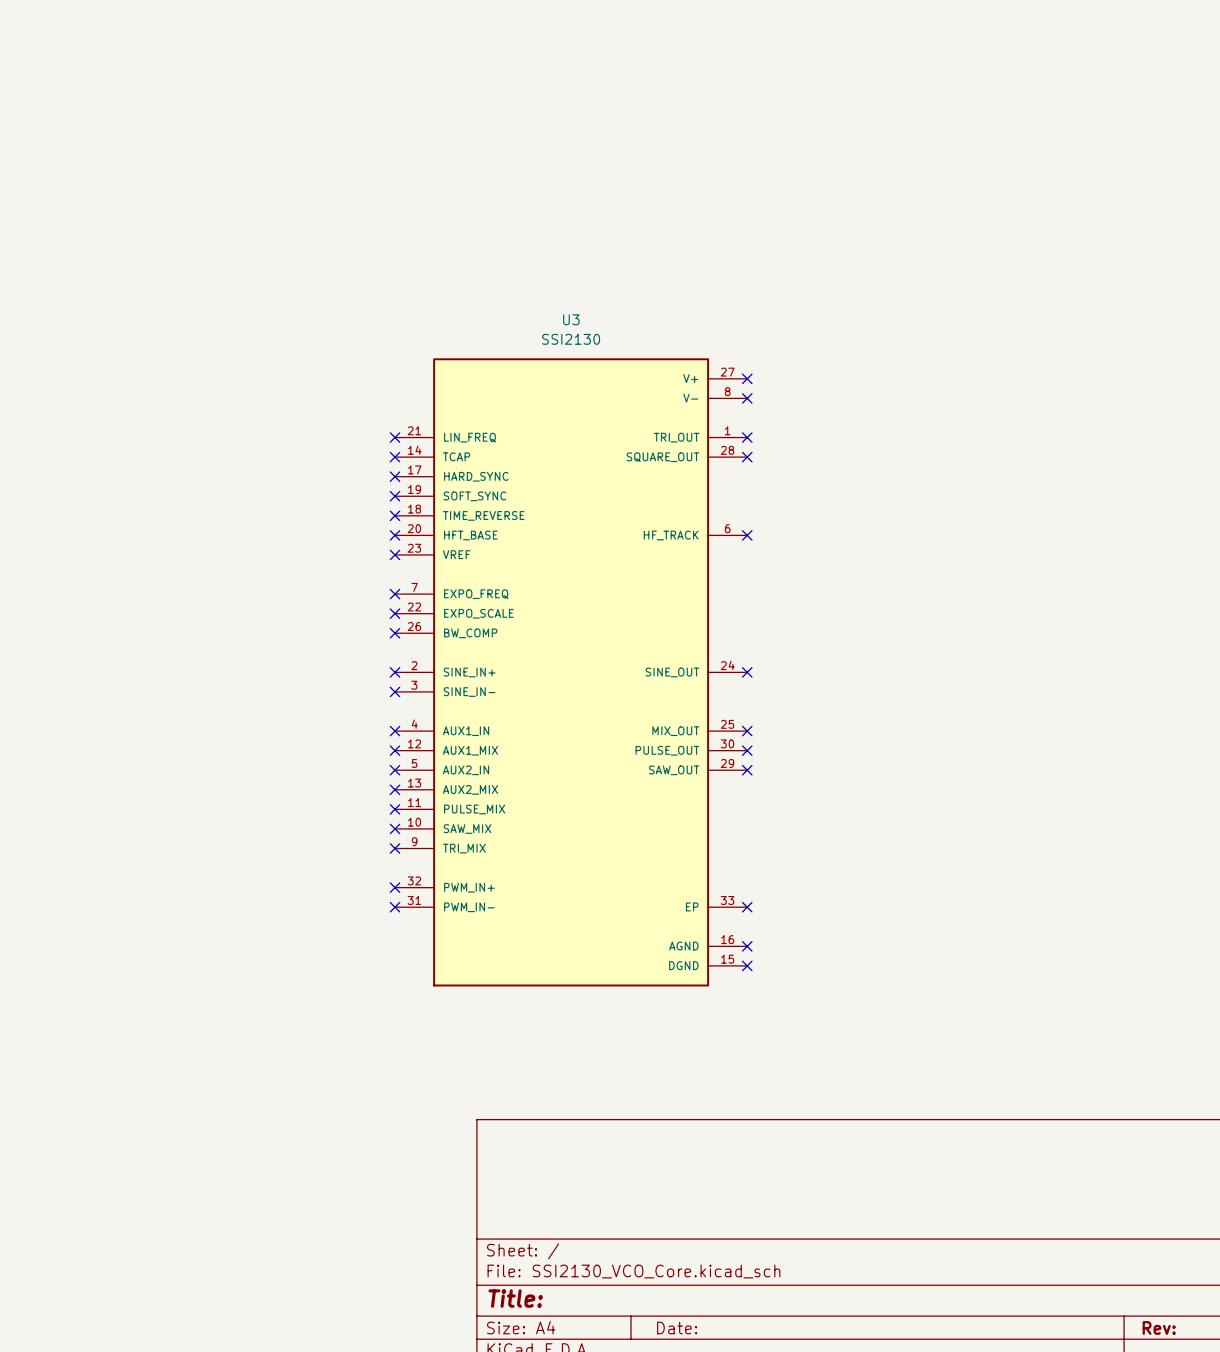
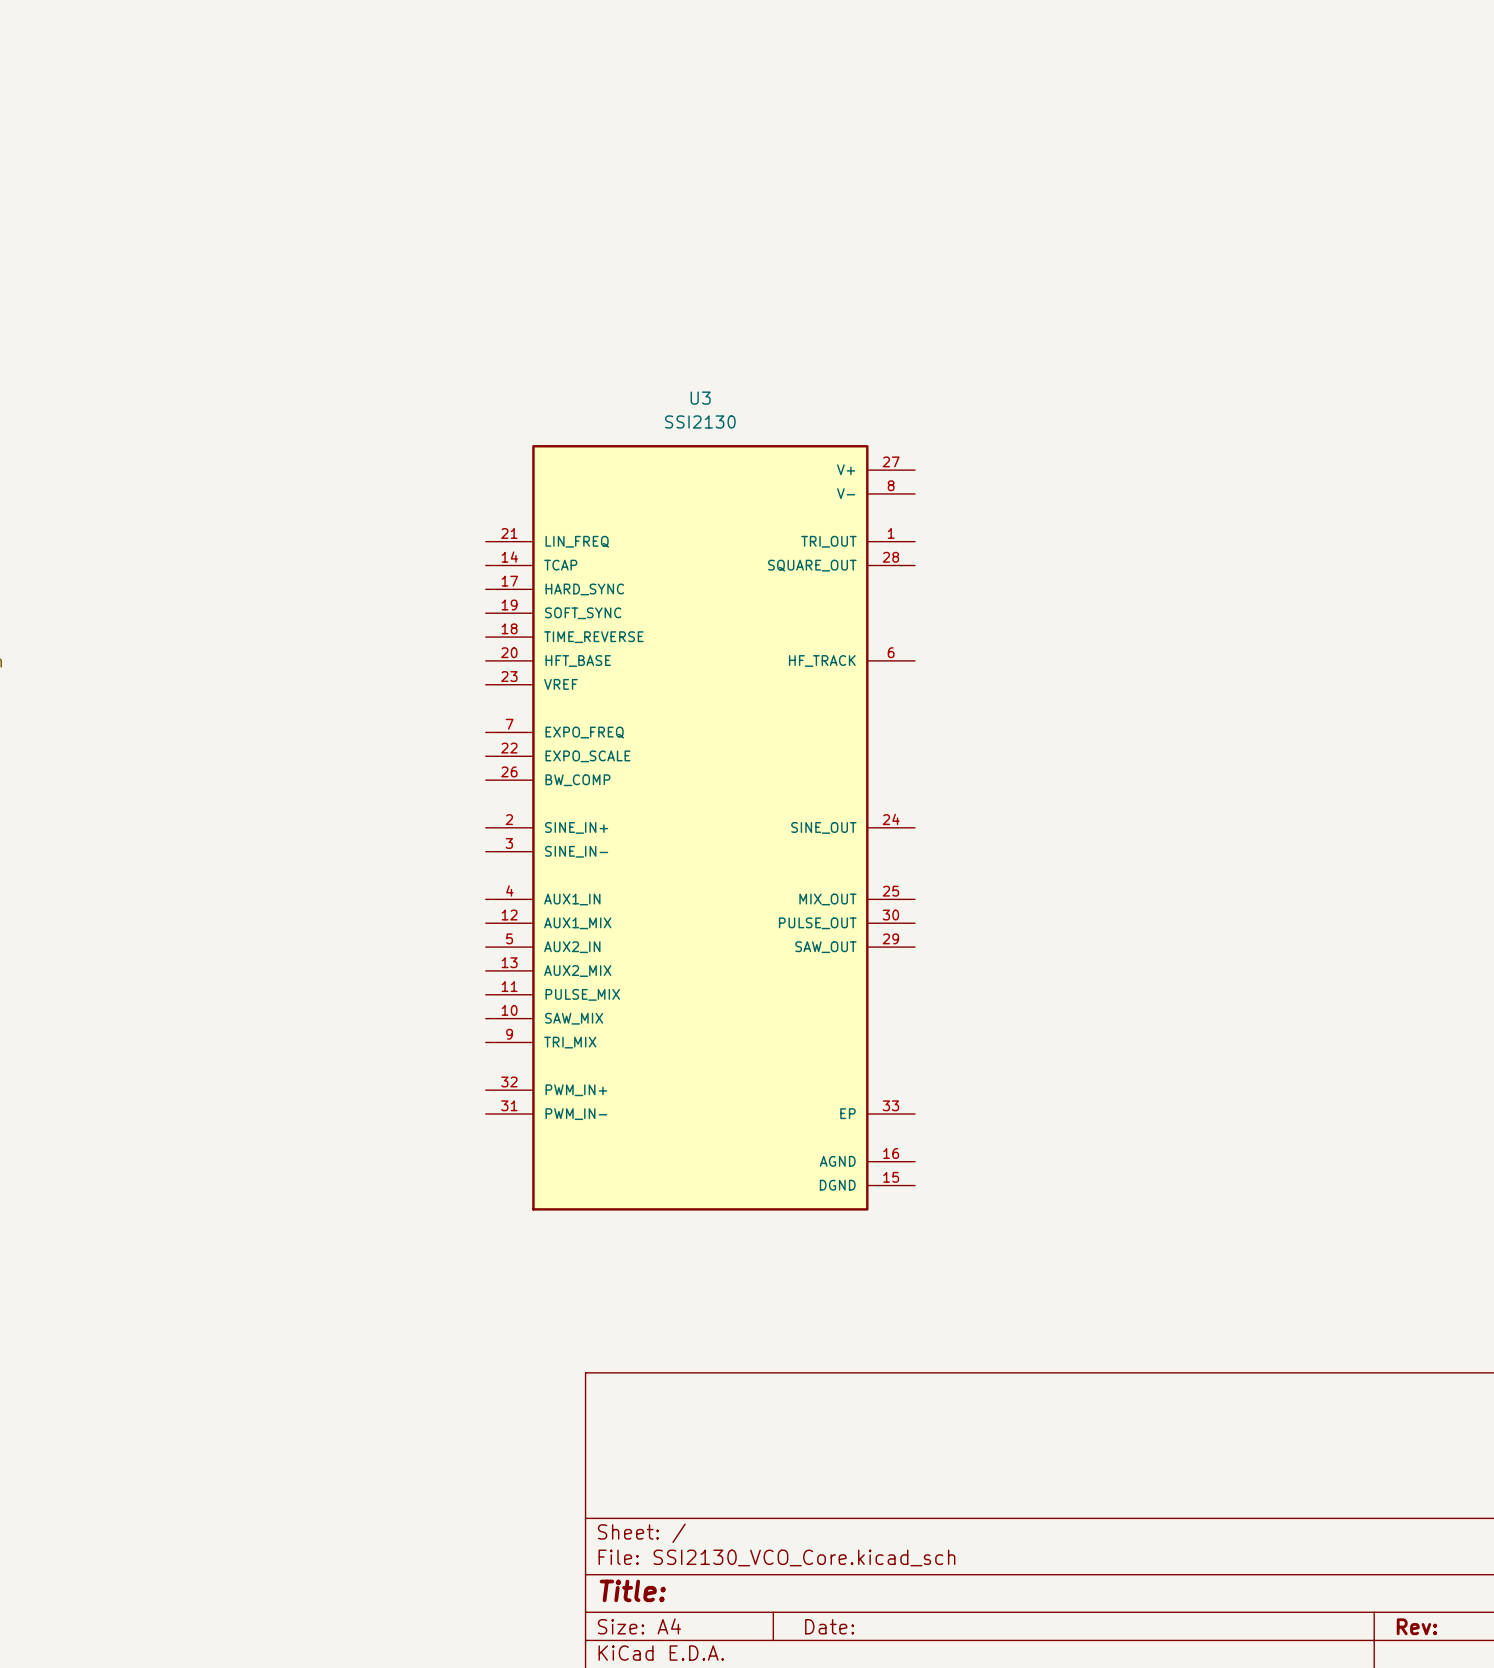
no-connect mark: (747, 378) -> none
no-connect mark: (747, 398) -> none
no-connect mark: (395, 437) -> none
no-connect mark: (747, 437) -> none
no-connect mark: (395, 457) -> none
no-connect mark: (747, 457) -> none
no-connect mark: (395, 476) -> none
no-connect mark: (395, 496) -> none
no-connect mark: (395, 515) -> none
no-connect mark: (395, 535) -> none
no-connect mark: (747, 535) -> none
no-connect mark: (395, 554) -> none
no-connect mark: (395, 594) -> none
no-connect mark: (395, 613) -> none
no-connect mark: (395, 633) -> none
no-connect mark: (395, 672) -> none
no-connect mark: (747, 672) -> none
no-connect mark: (395, 691) -> none
no-connect mark: (395, 731) -> none
no-connect mark: (747, 731) -> none
no-connect mark: (395, 750) -> none
no-connect mark: (747, 750) -> none
no-connect mark: (395, 770) -> none
no-connect mark: (747, 770) -> none
no-connect mark: (395, 789) -> none
no-connect mark: (395, 809) -> none
no-connect mark: (395, 828) -> none
no-connect mark: (395, 848) -> none
no-connect mark: (395, 887) -> none
no-connect mark: (395, 907) -> none
no-connect mark: (747, 907) -> none
no-connect mark: (747, 946) -> none
no-connect mark: (747, 965) -> none

